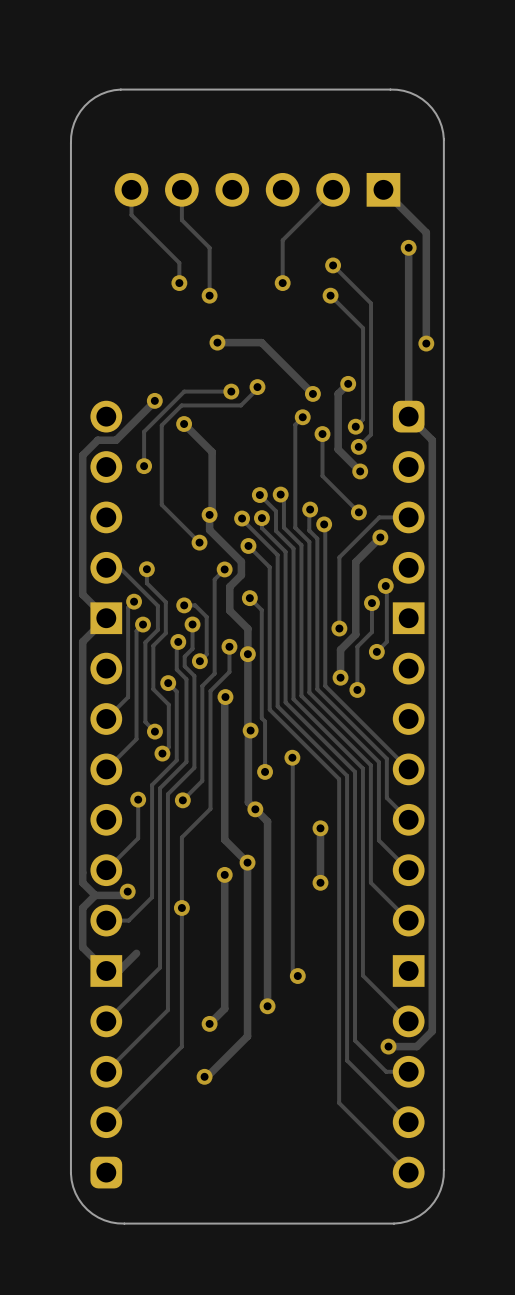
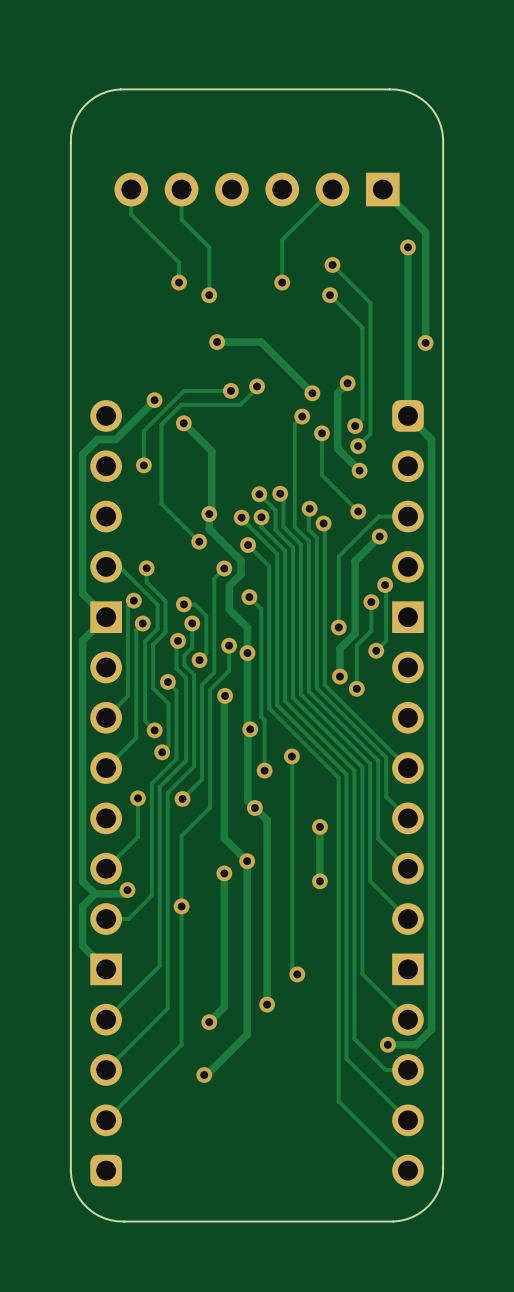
track: (136, 953) (118, 970) (106, 970) -> none

